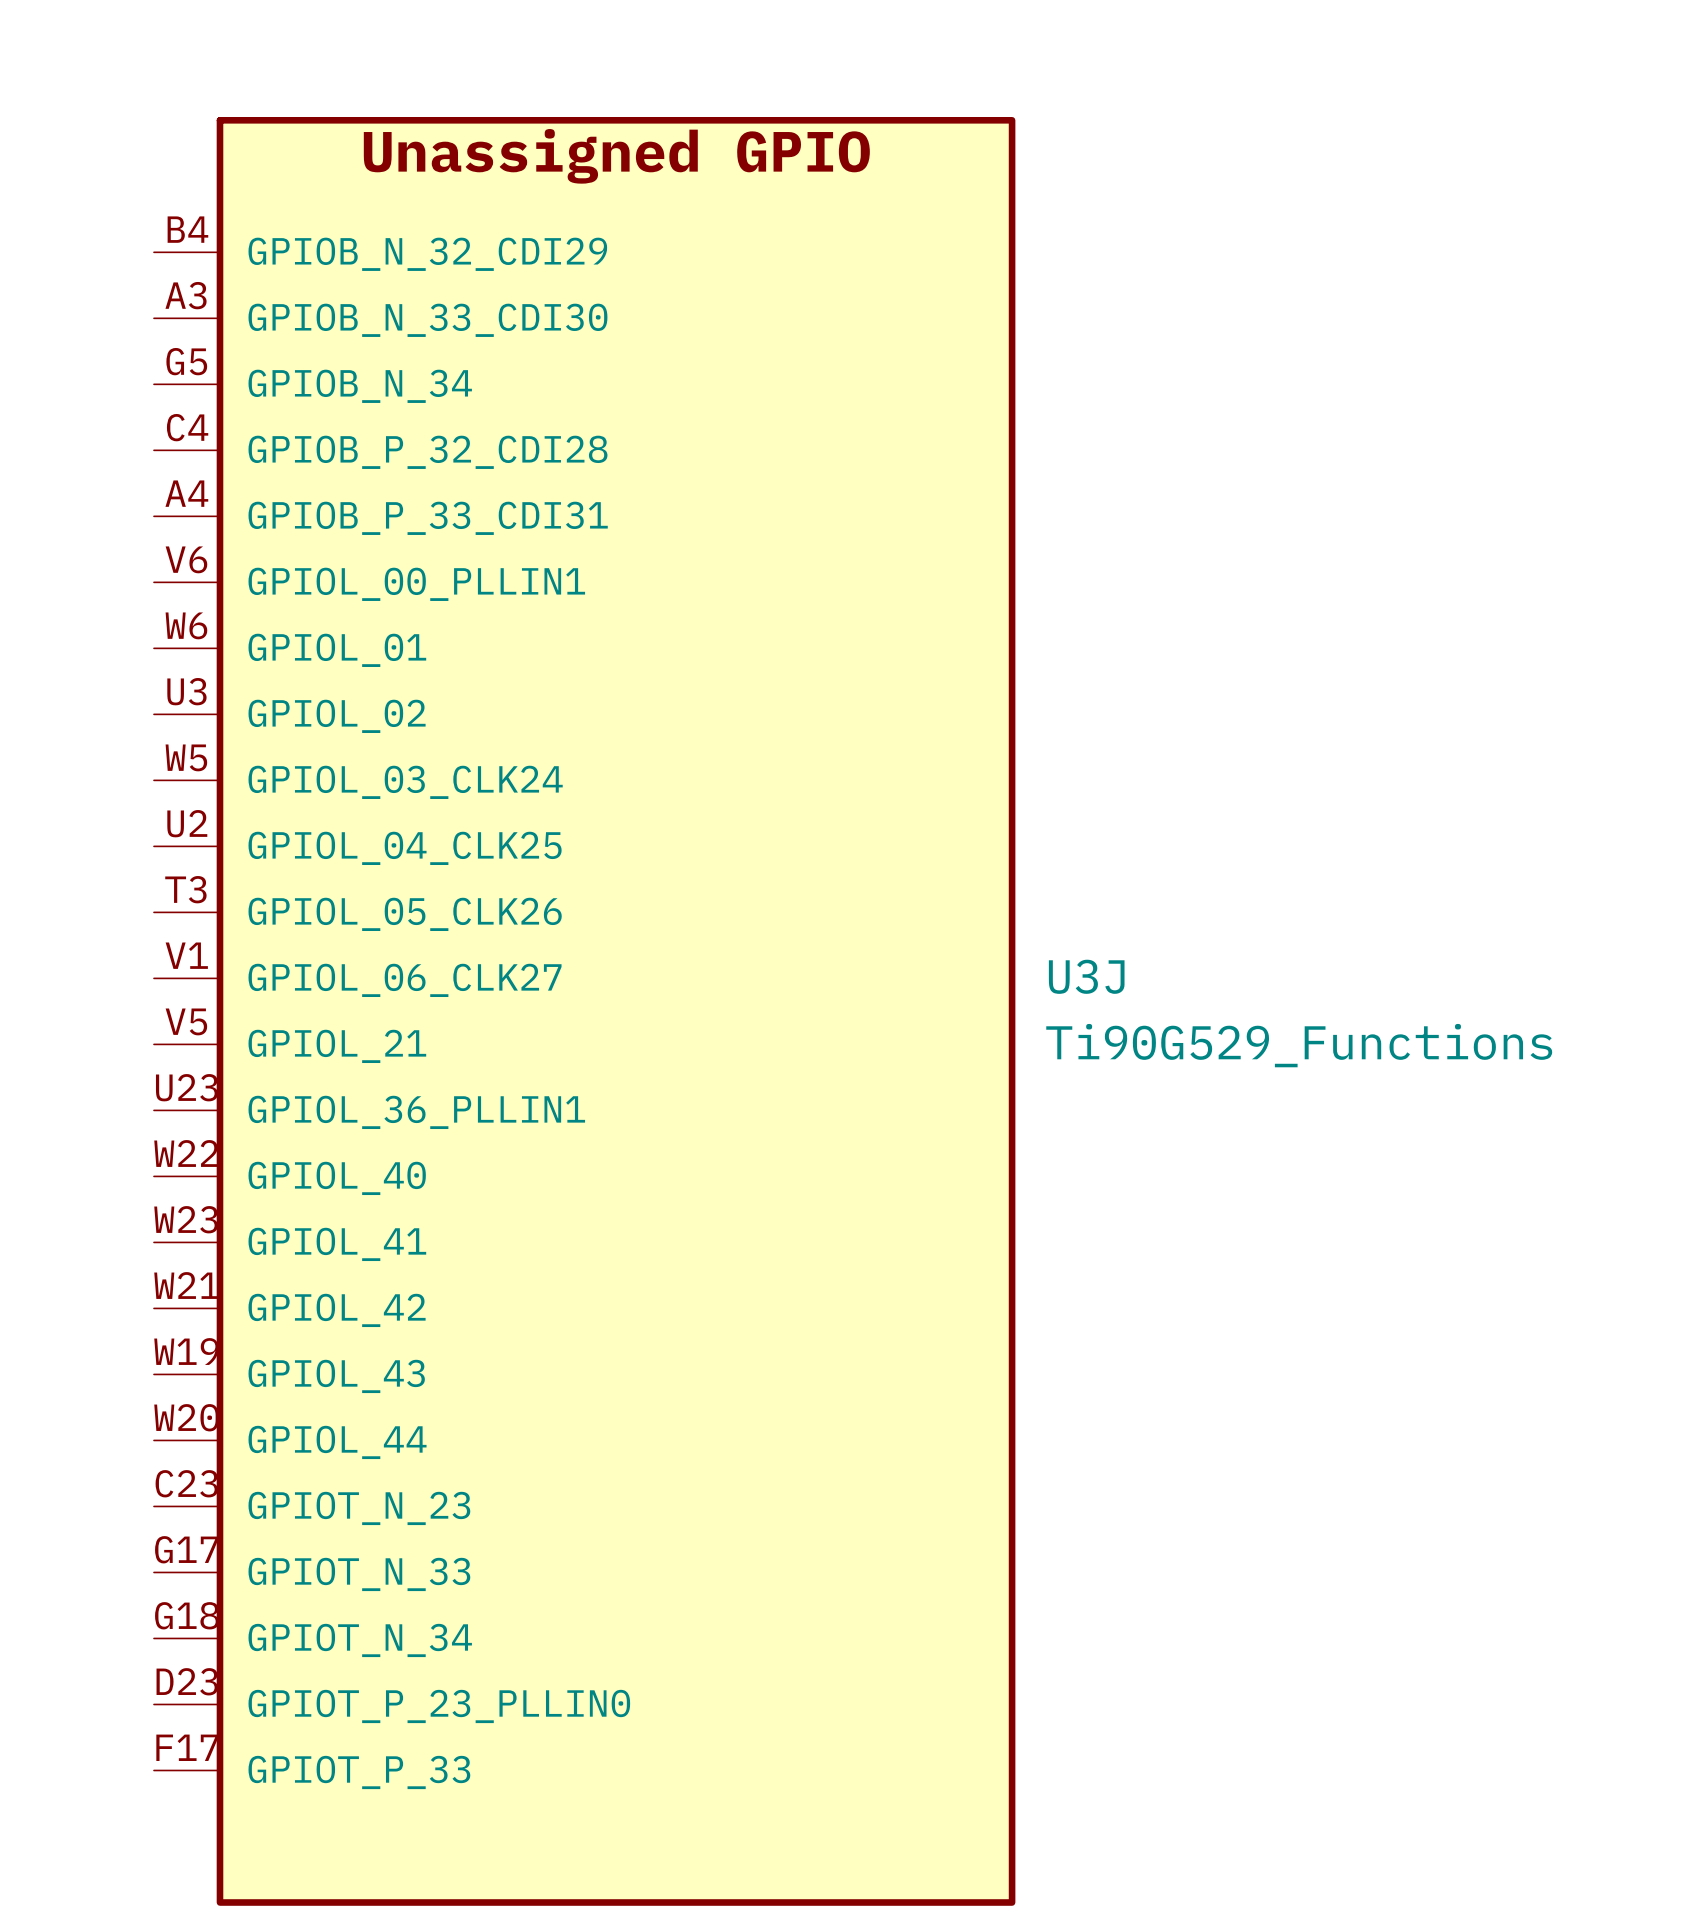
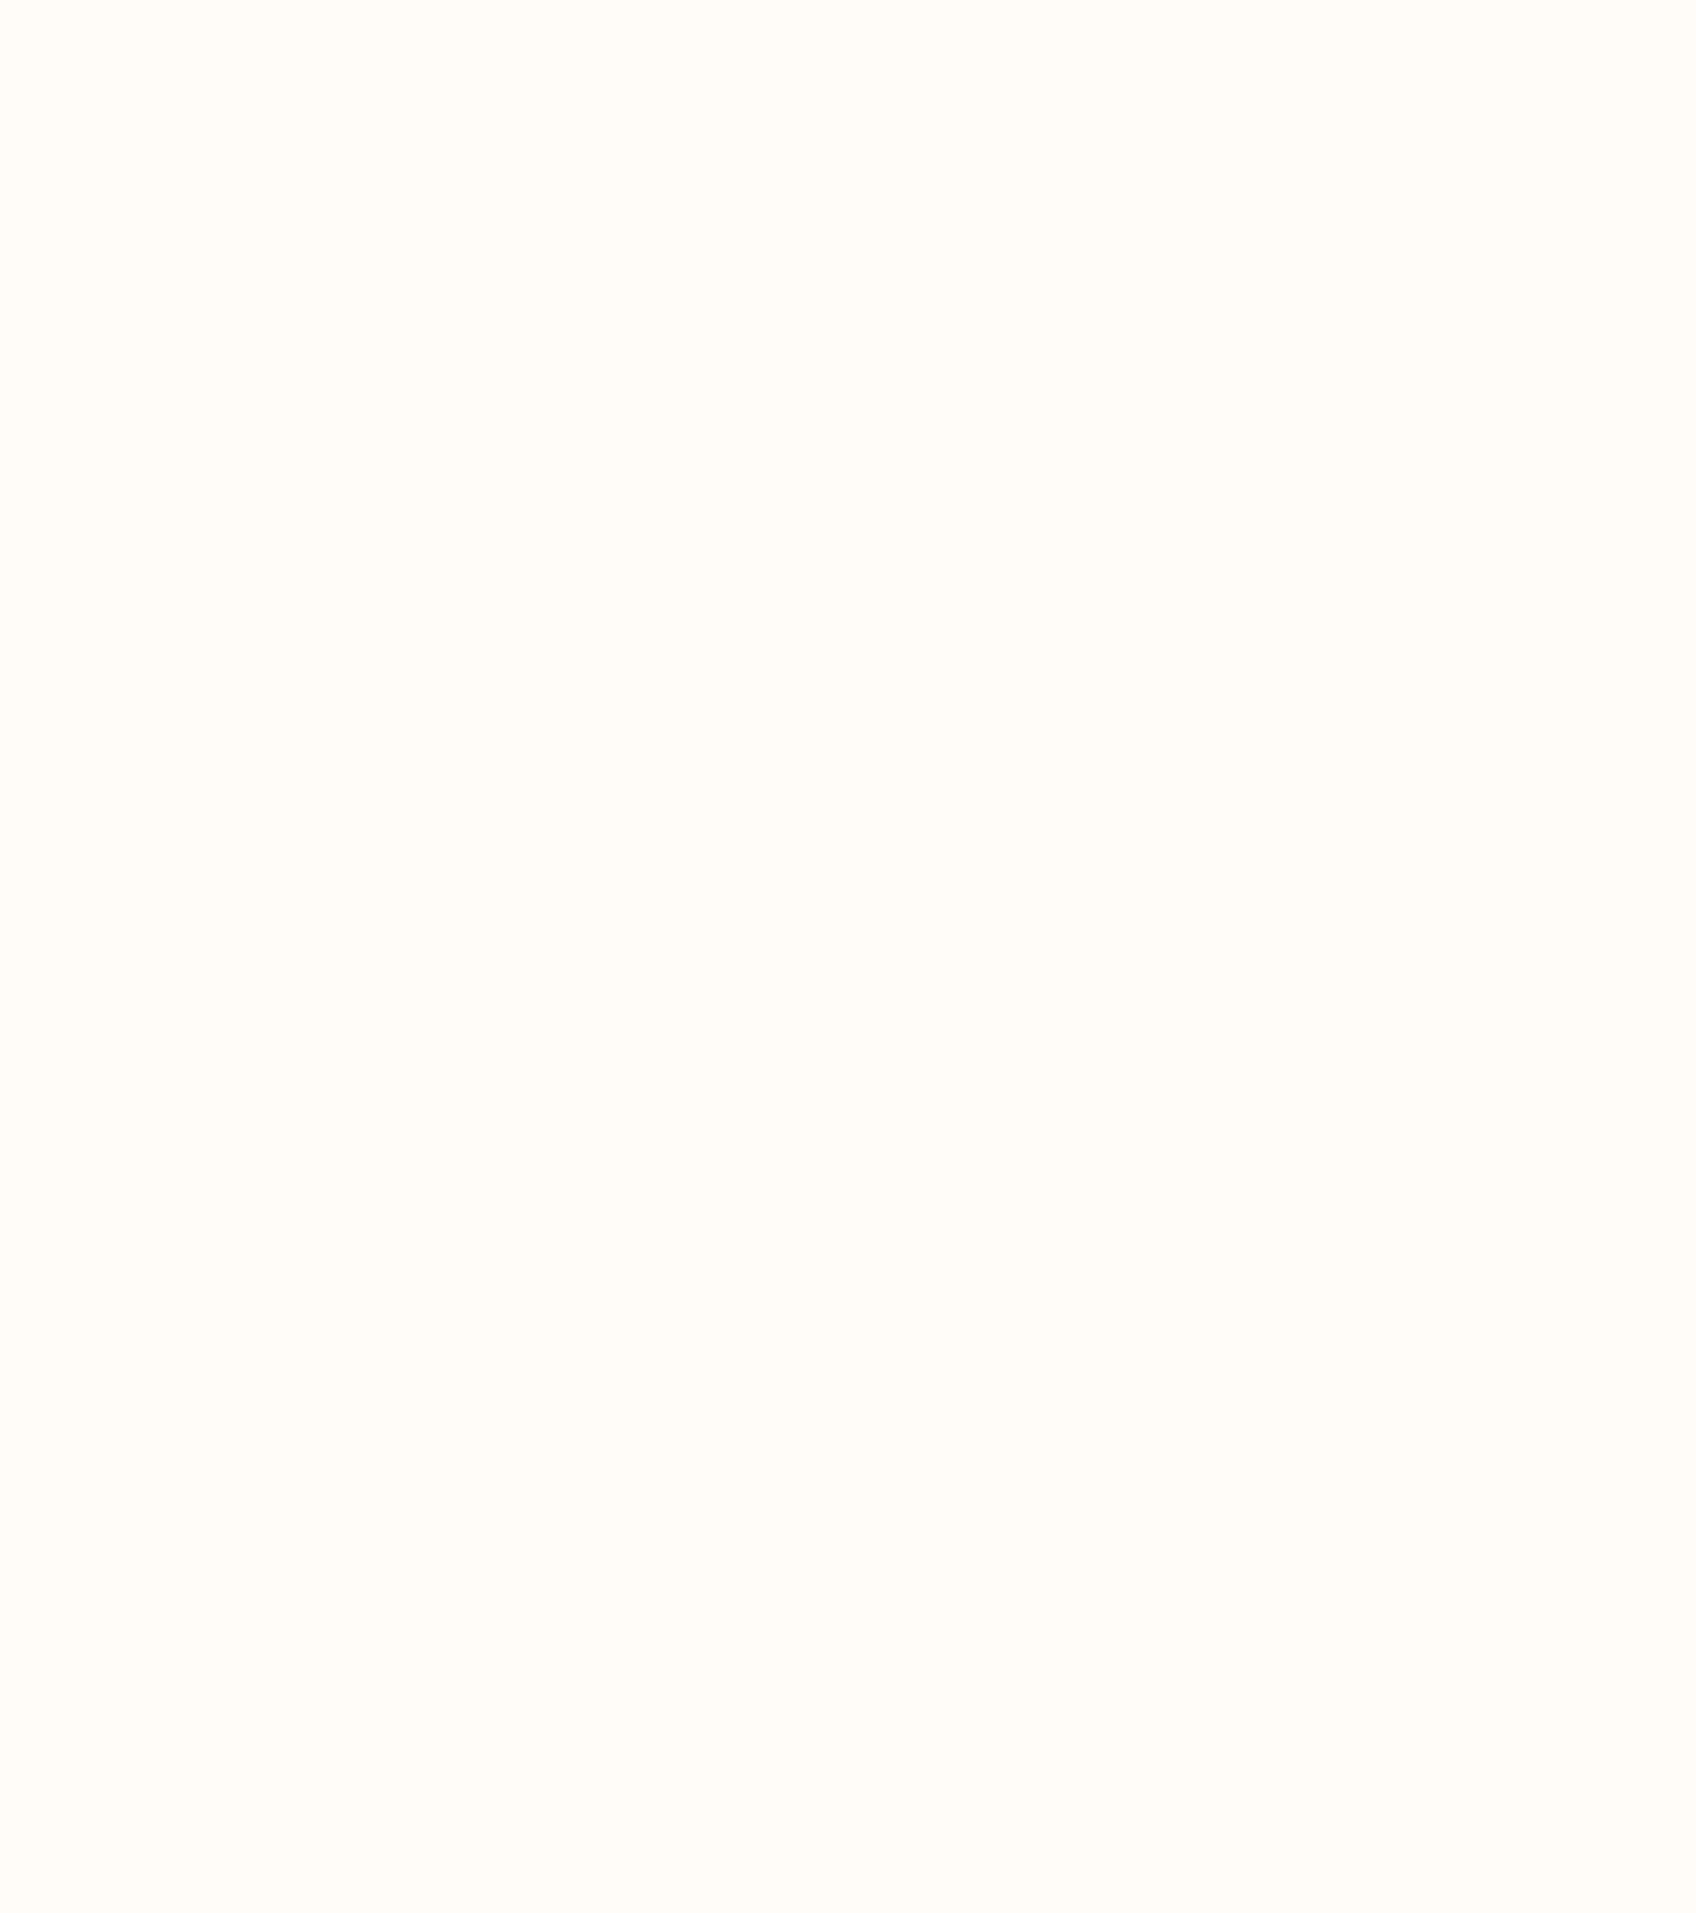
U3J: Ti90G529_Functions (584, 1011) -> none

